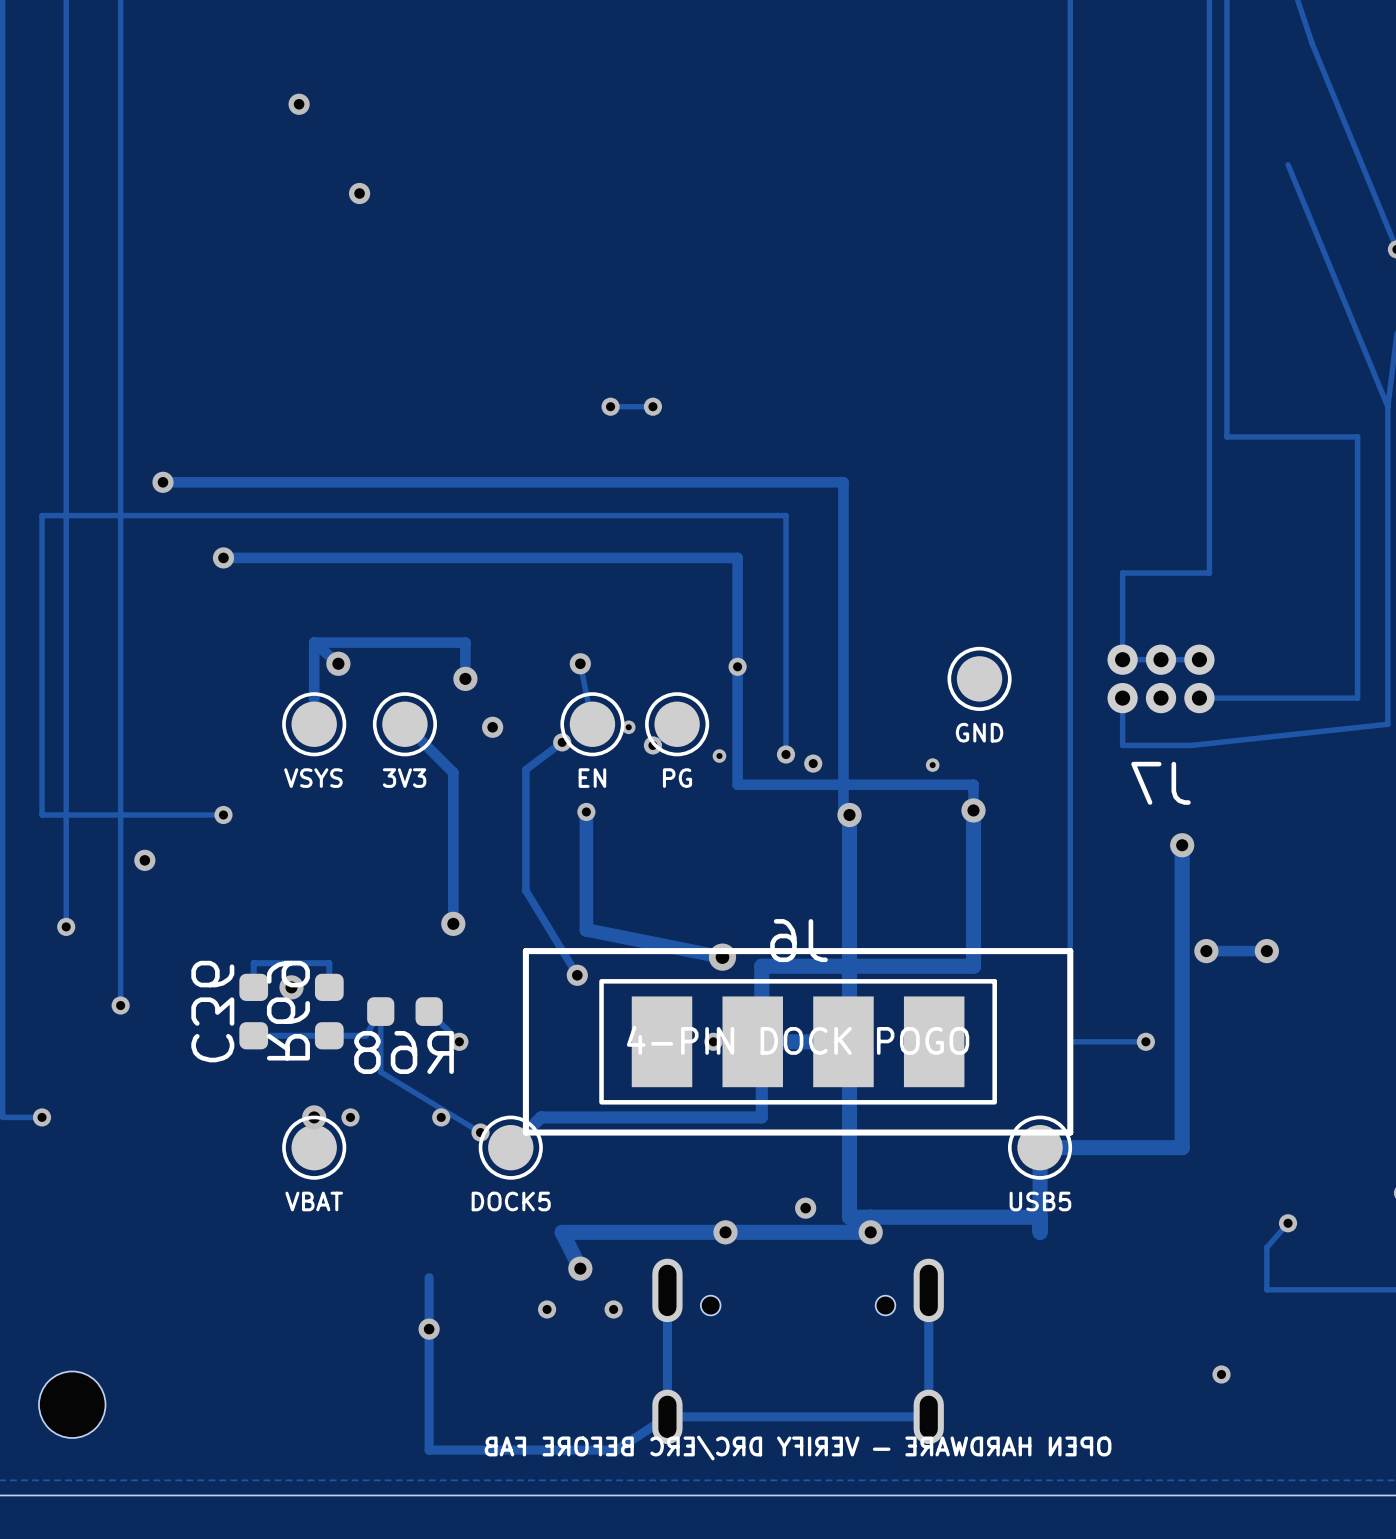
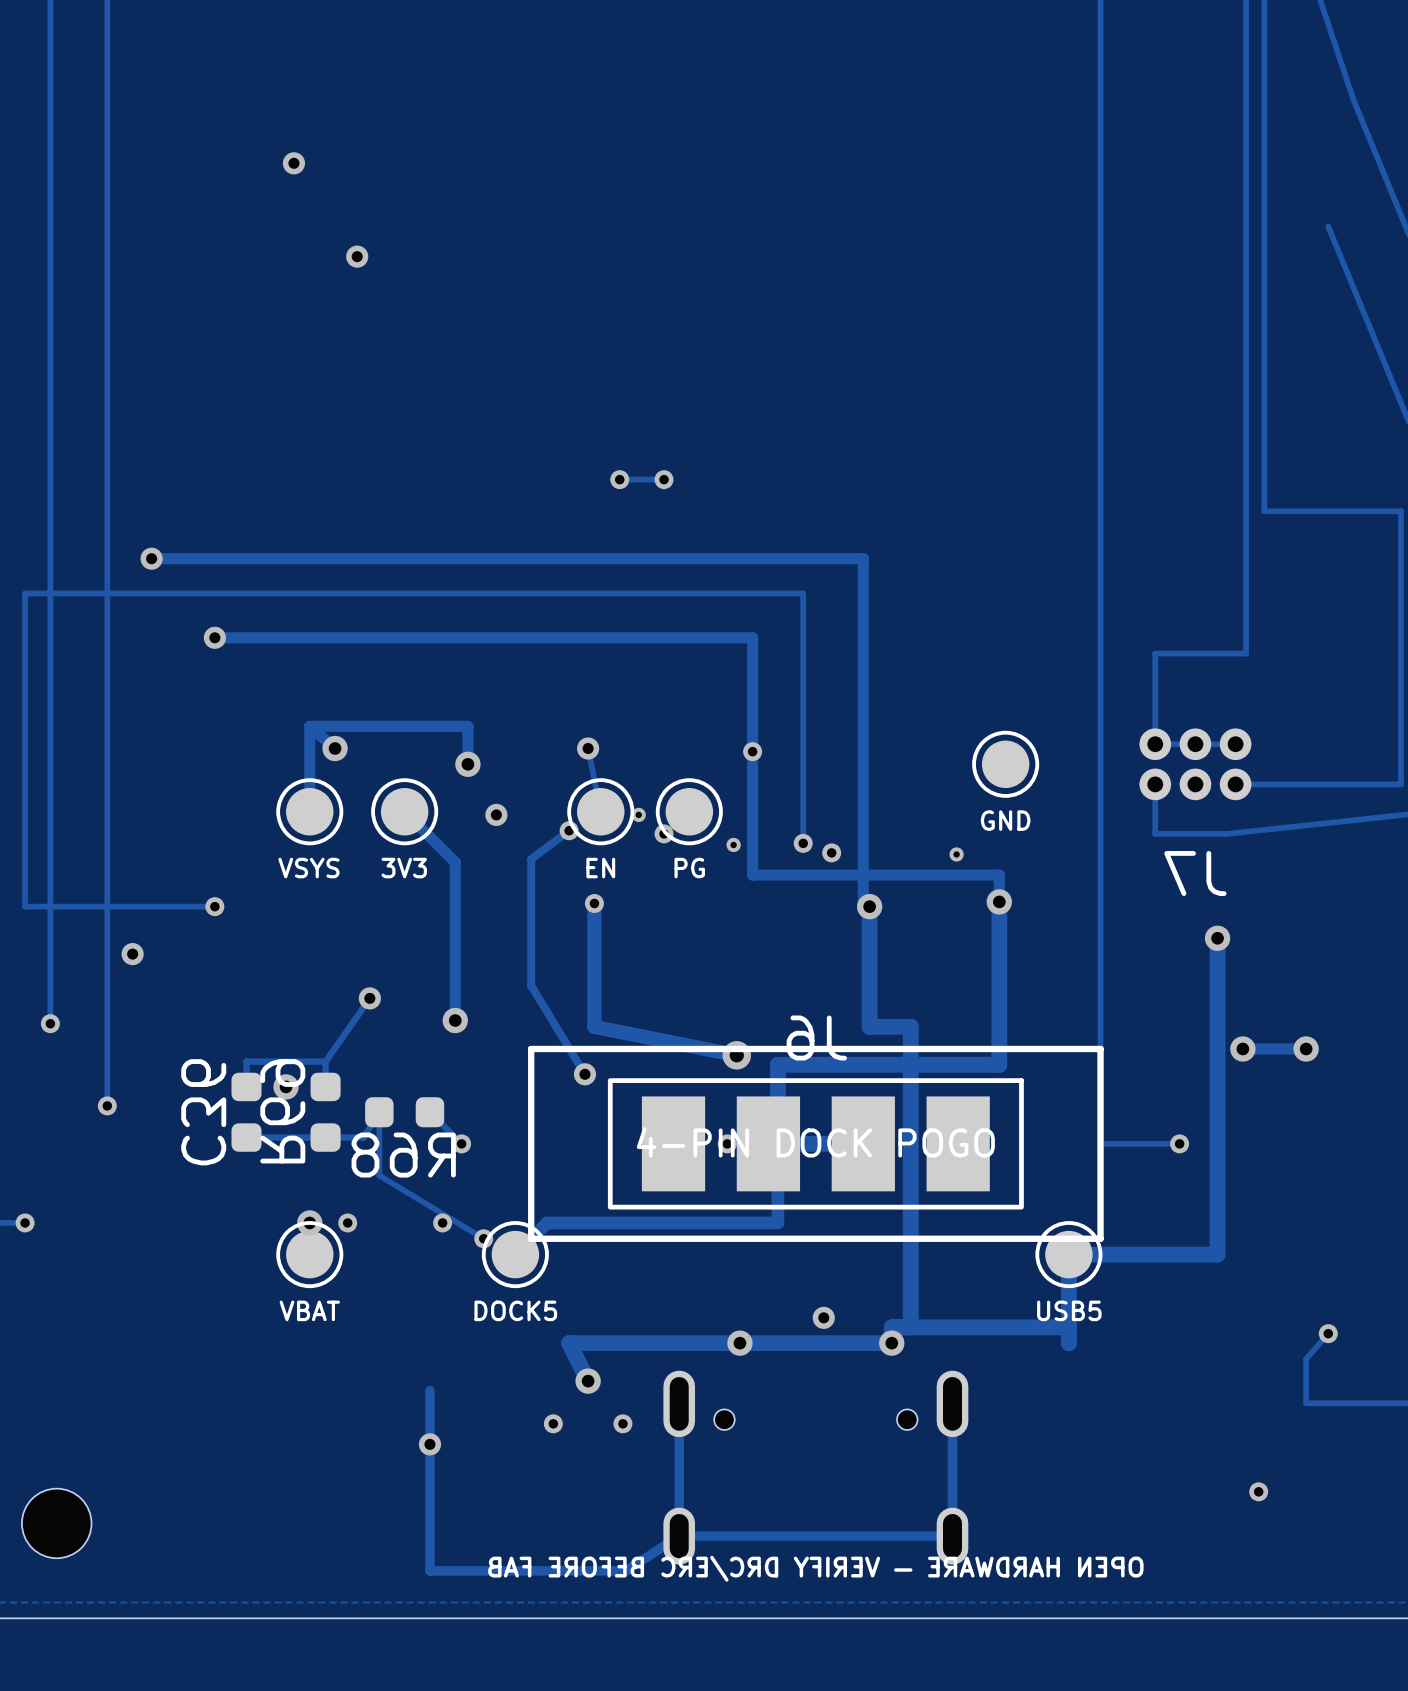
track: none -> (369, 998) (325, 1061)
via: none -> (369, 998)
track: (849, 929) (849, 1217) (870, 1217) -> (869, 1026) (910, 1026) (910, 1327)

